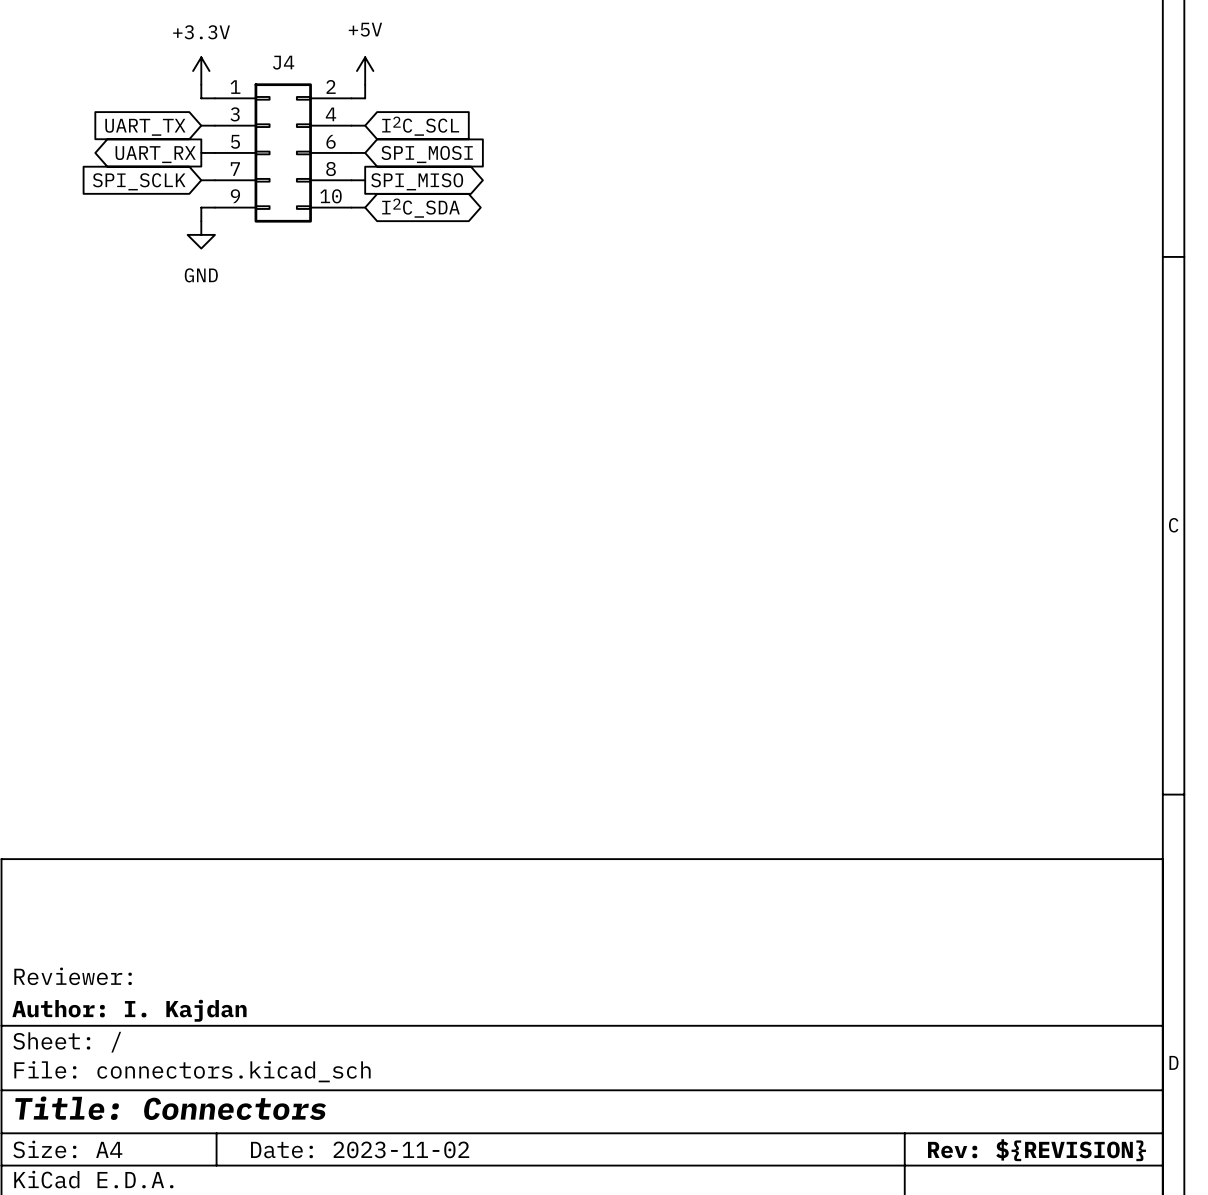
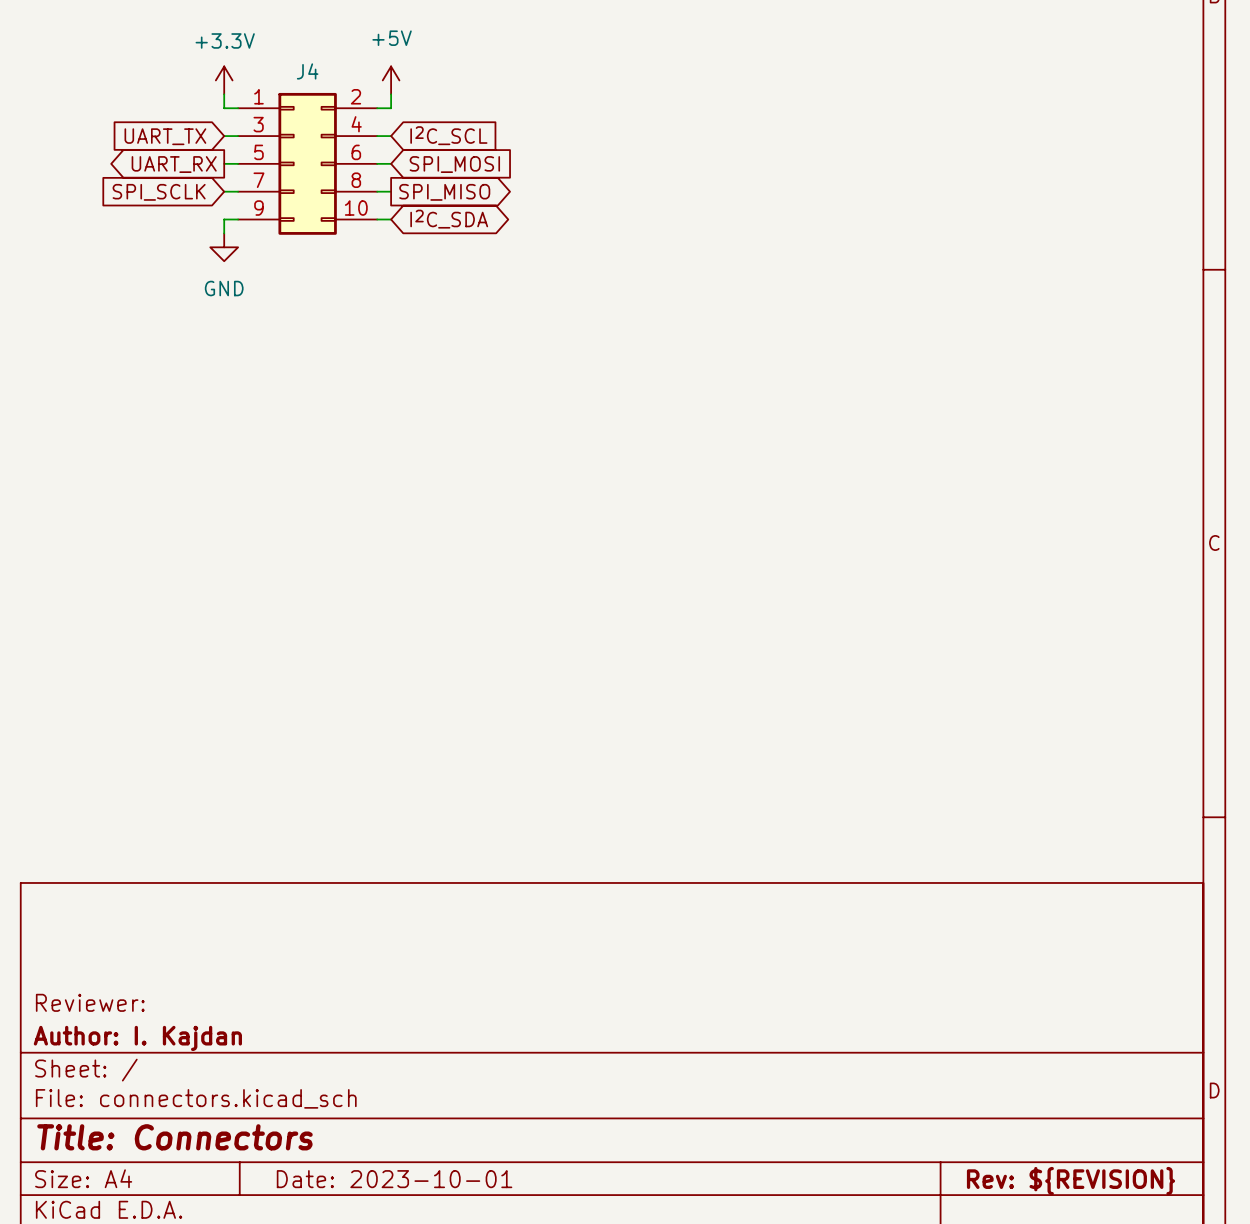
title block: Date: 2023-11-02 (360, 1149) -> Date: 2023-10-01 (394, 1179)

